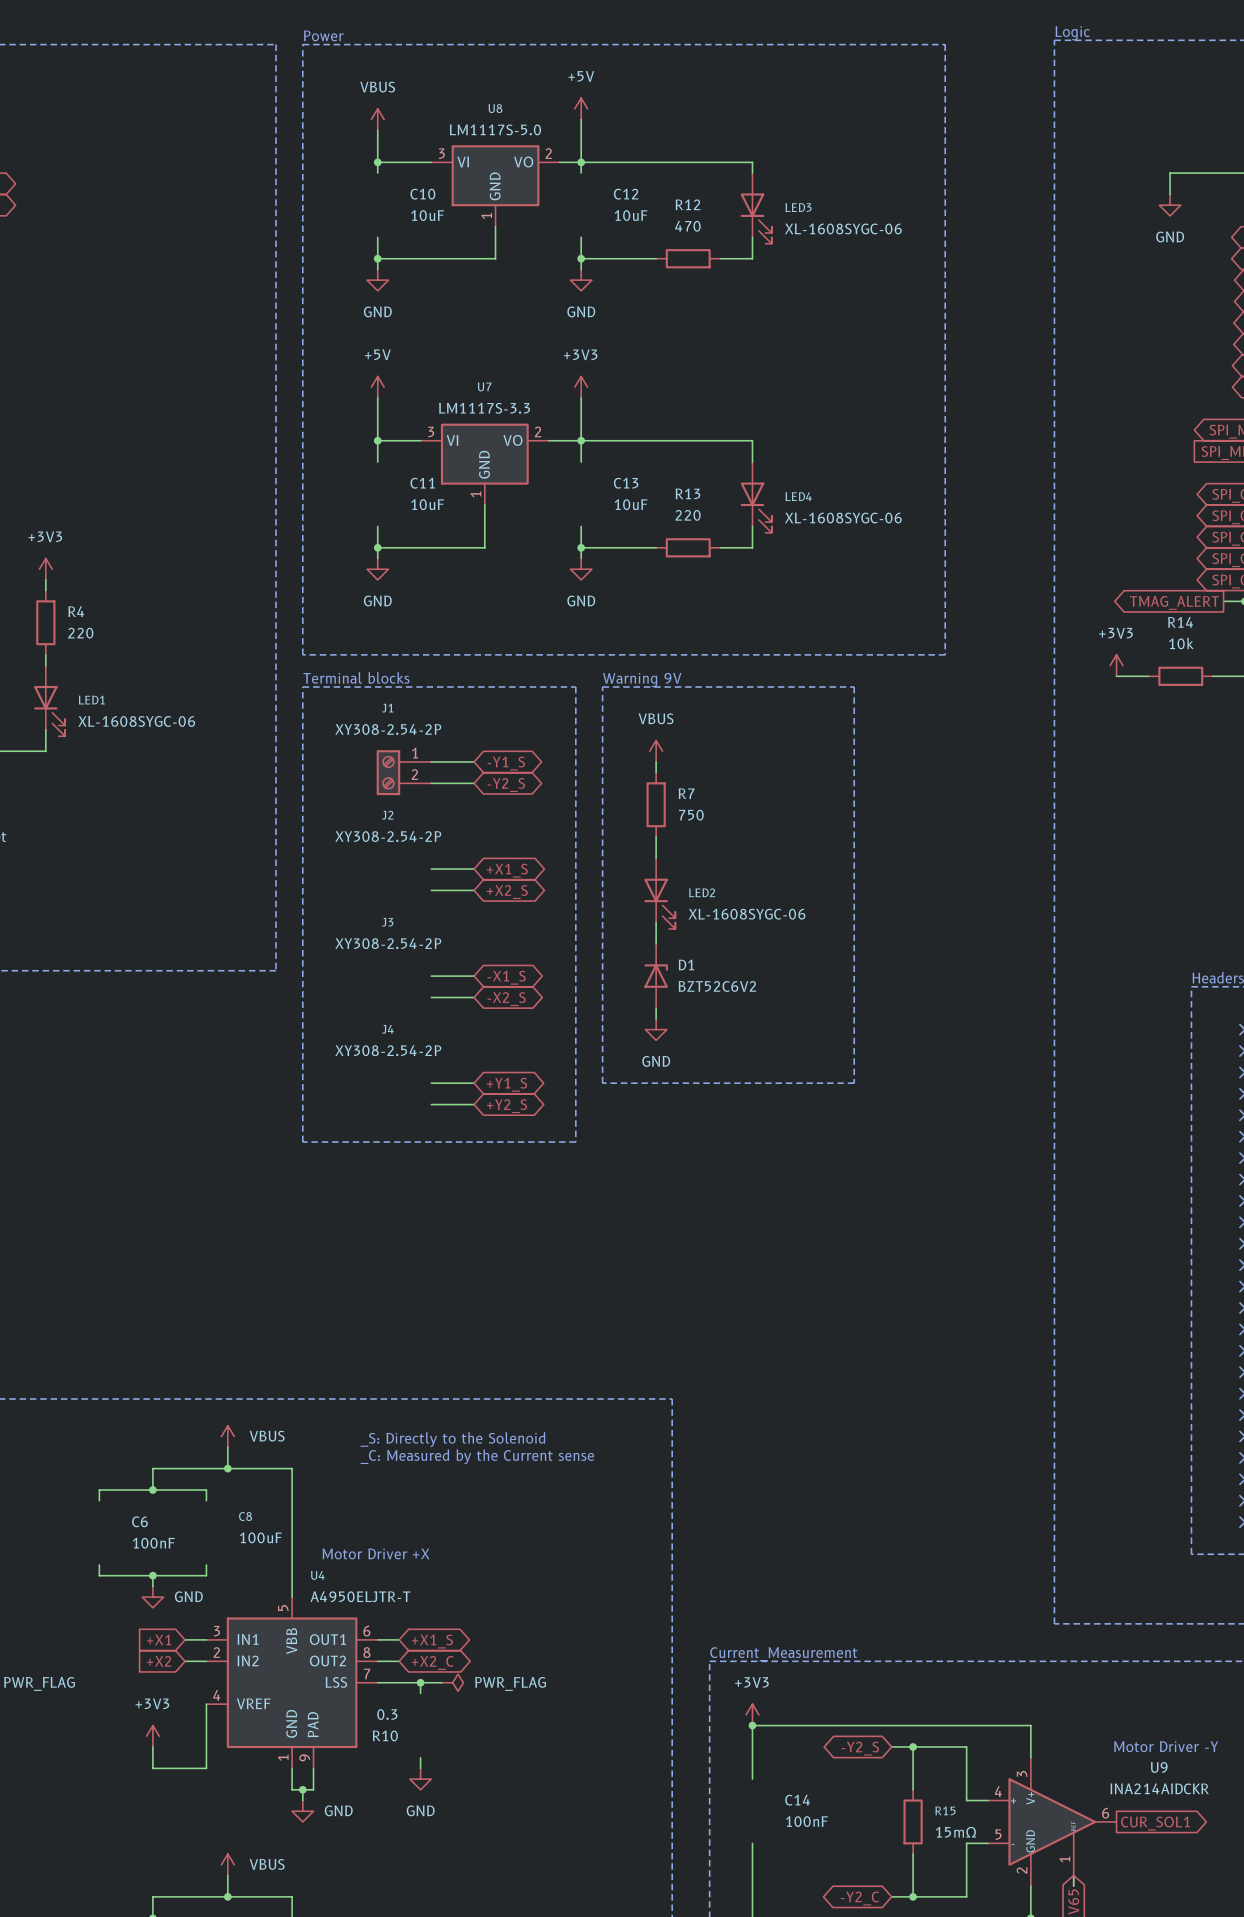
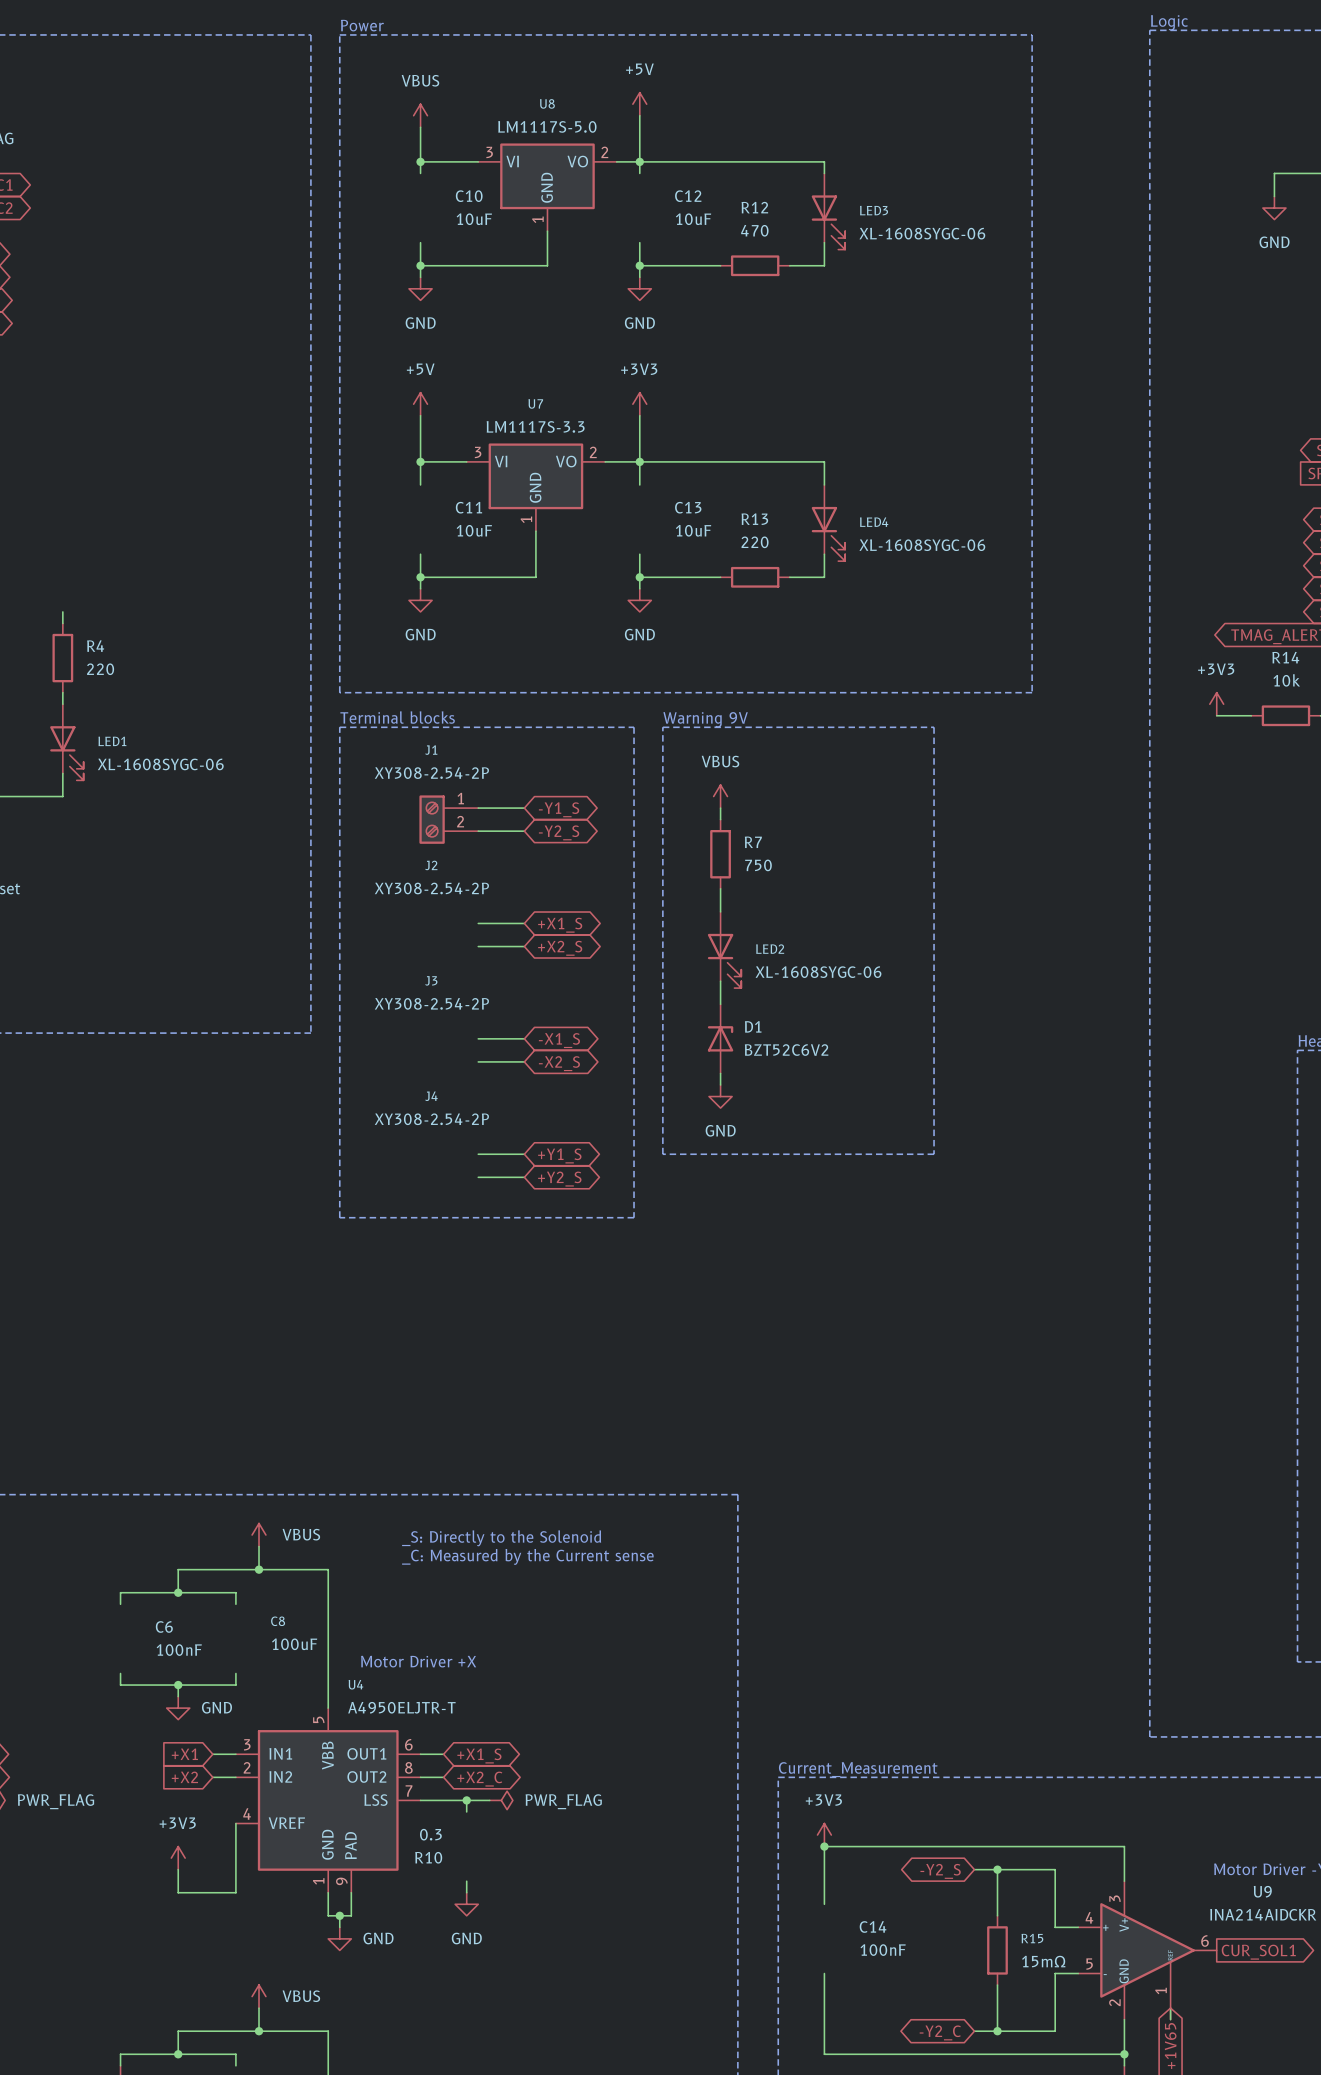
power symbol: +3V3 (45, 569) -> none

